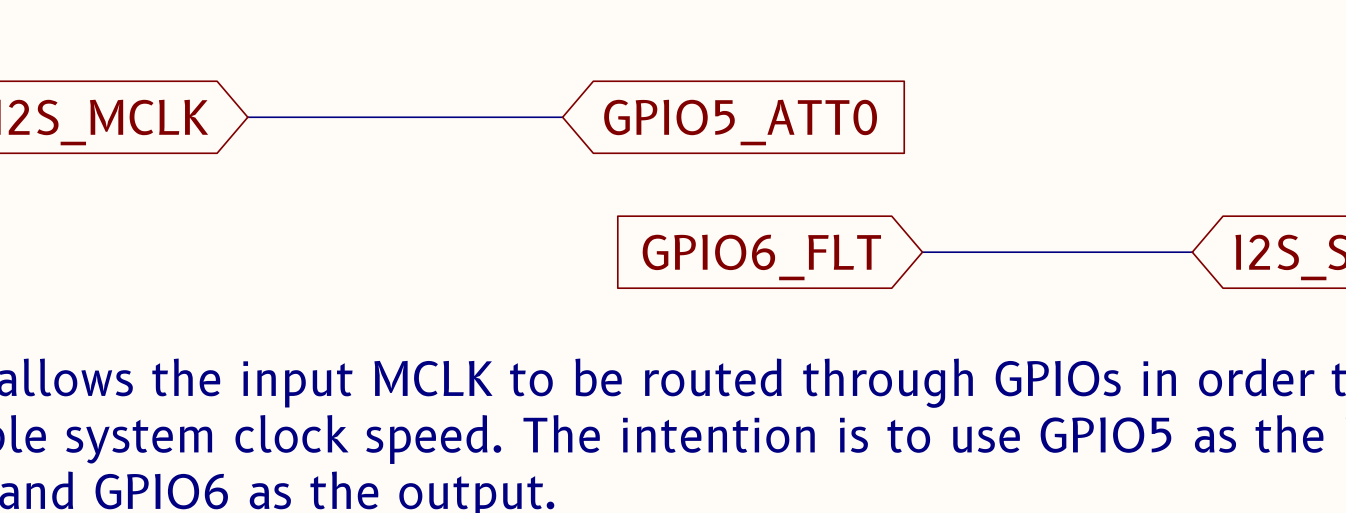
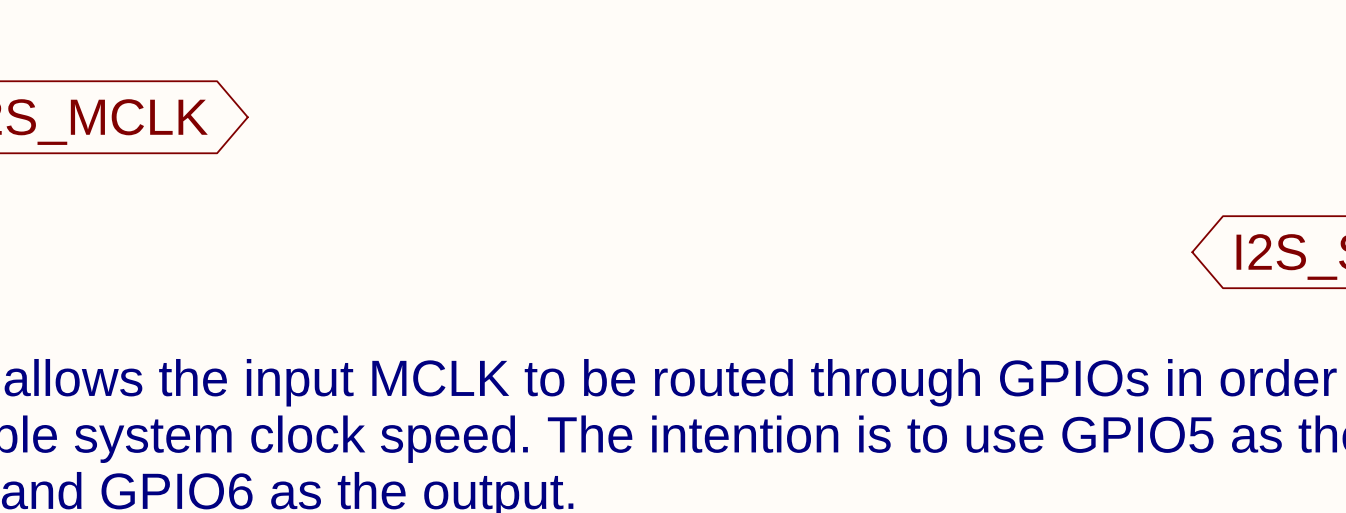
wire: (247, 117) (562, 117) -> none
global label: GPIO5_ATT0 (740, 122) -> none
wire: (922, 252) (1192, 252) -> none
global label: GPIO6_FLT (761, 257) -> none

